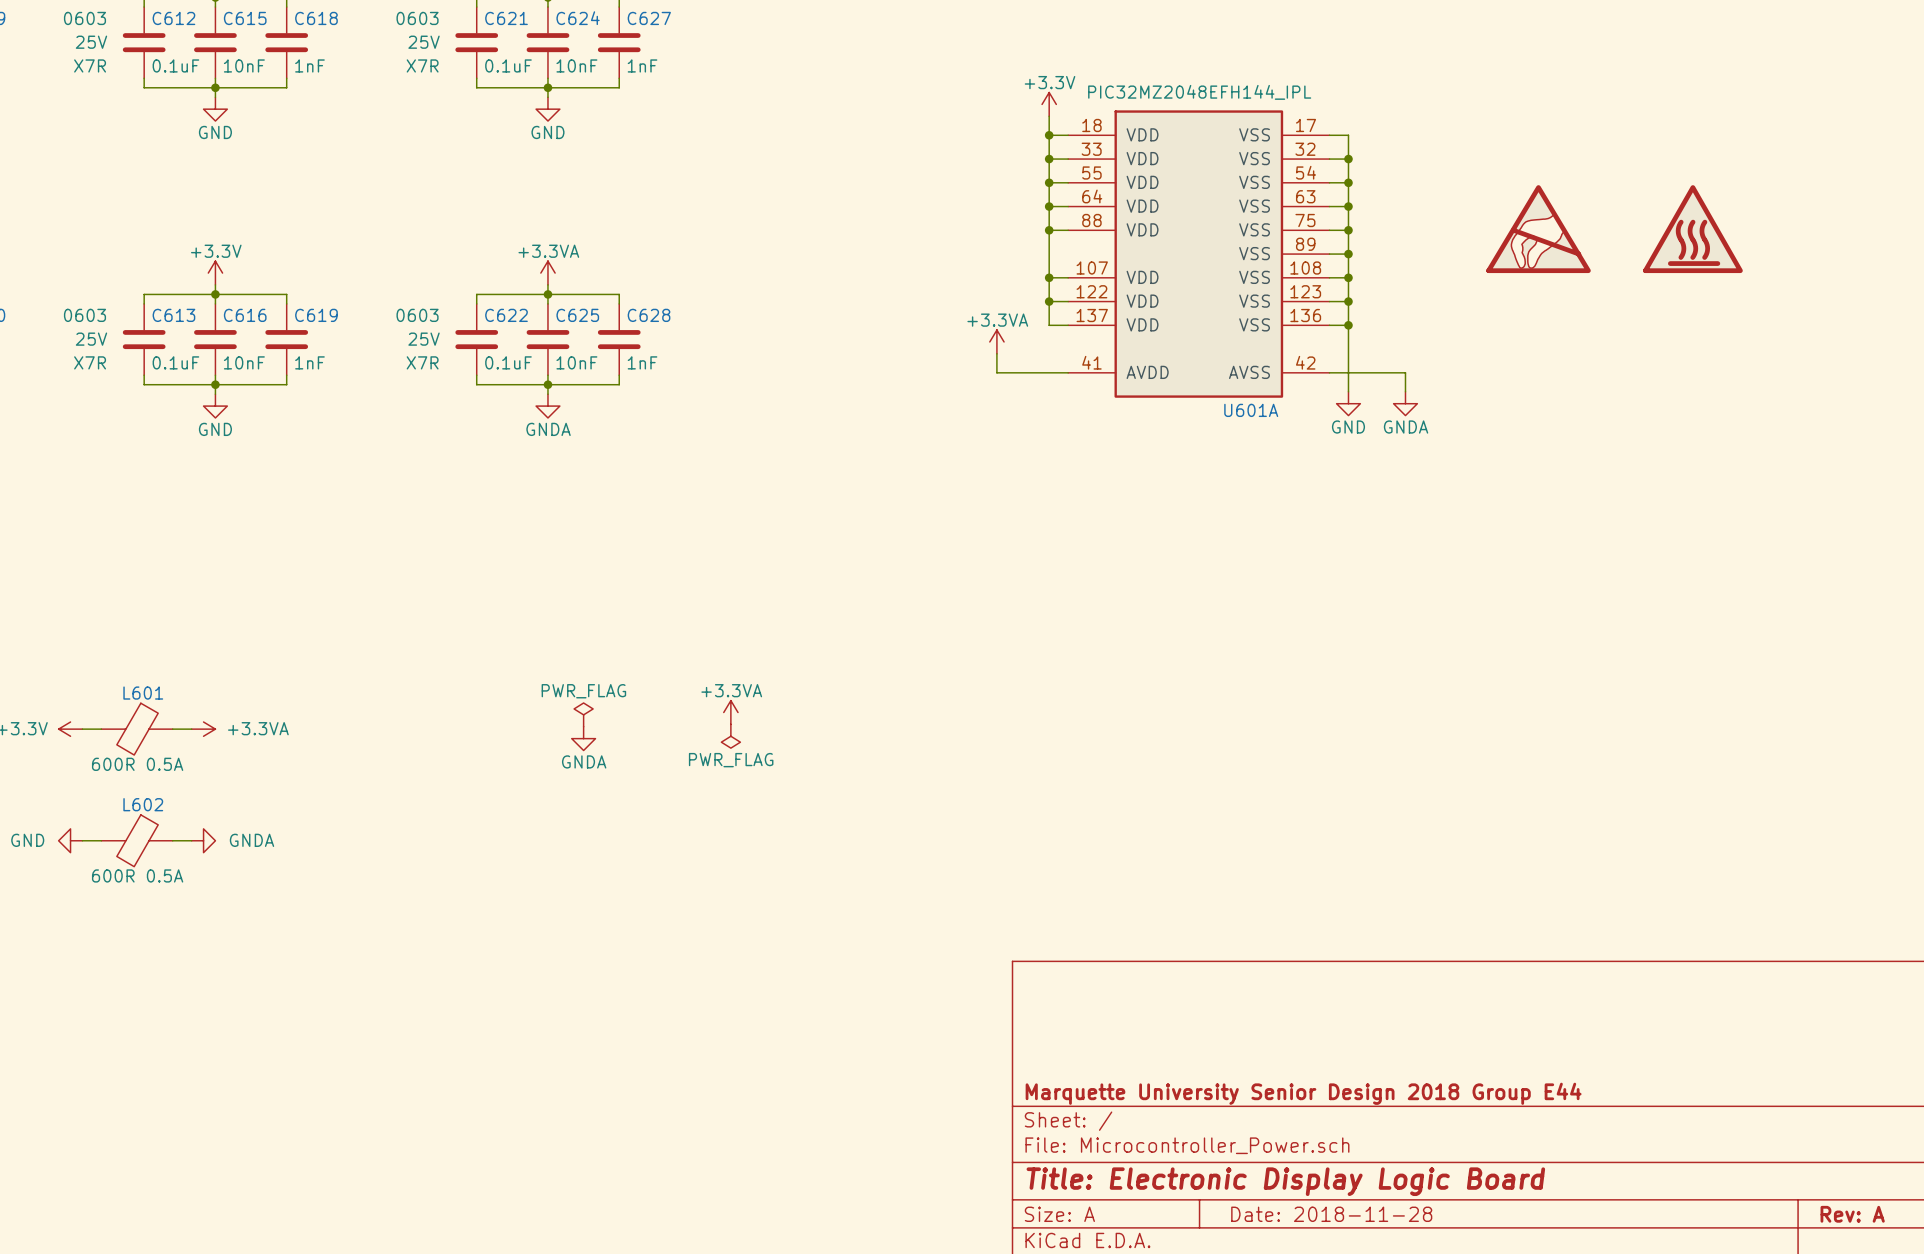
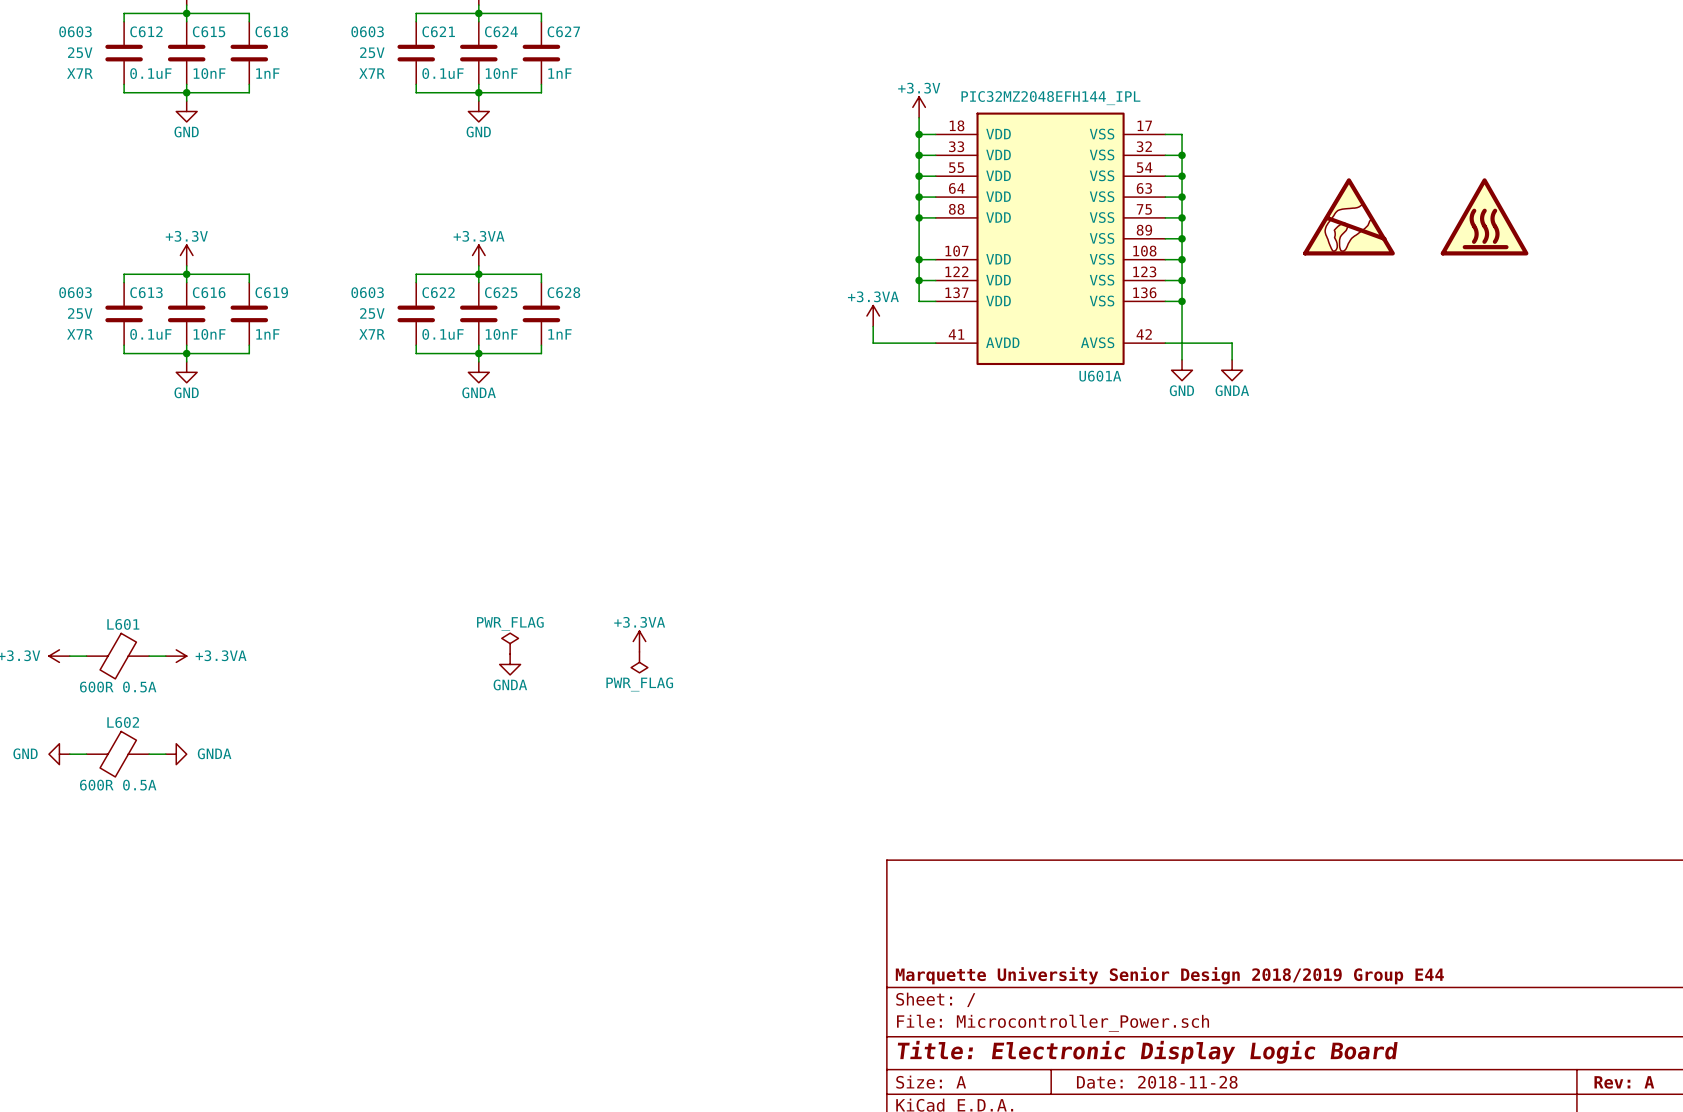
title block: Marquette University Senior Design 2018 Group E44 (1303, 1093) -> Marquette University Senior Design 2018/2019 Group E44 (1169, 975)

